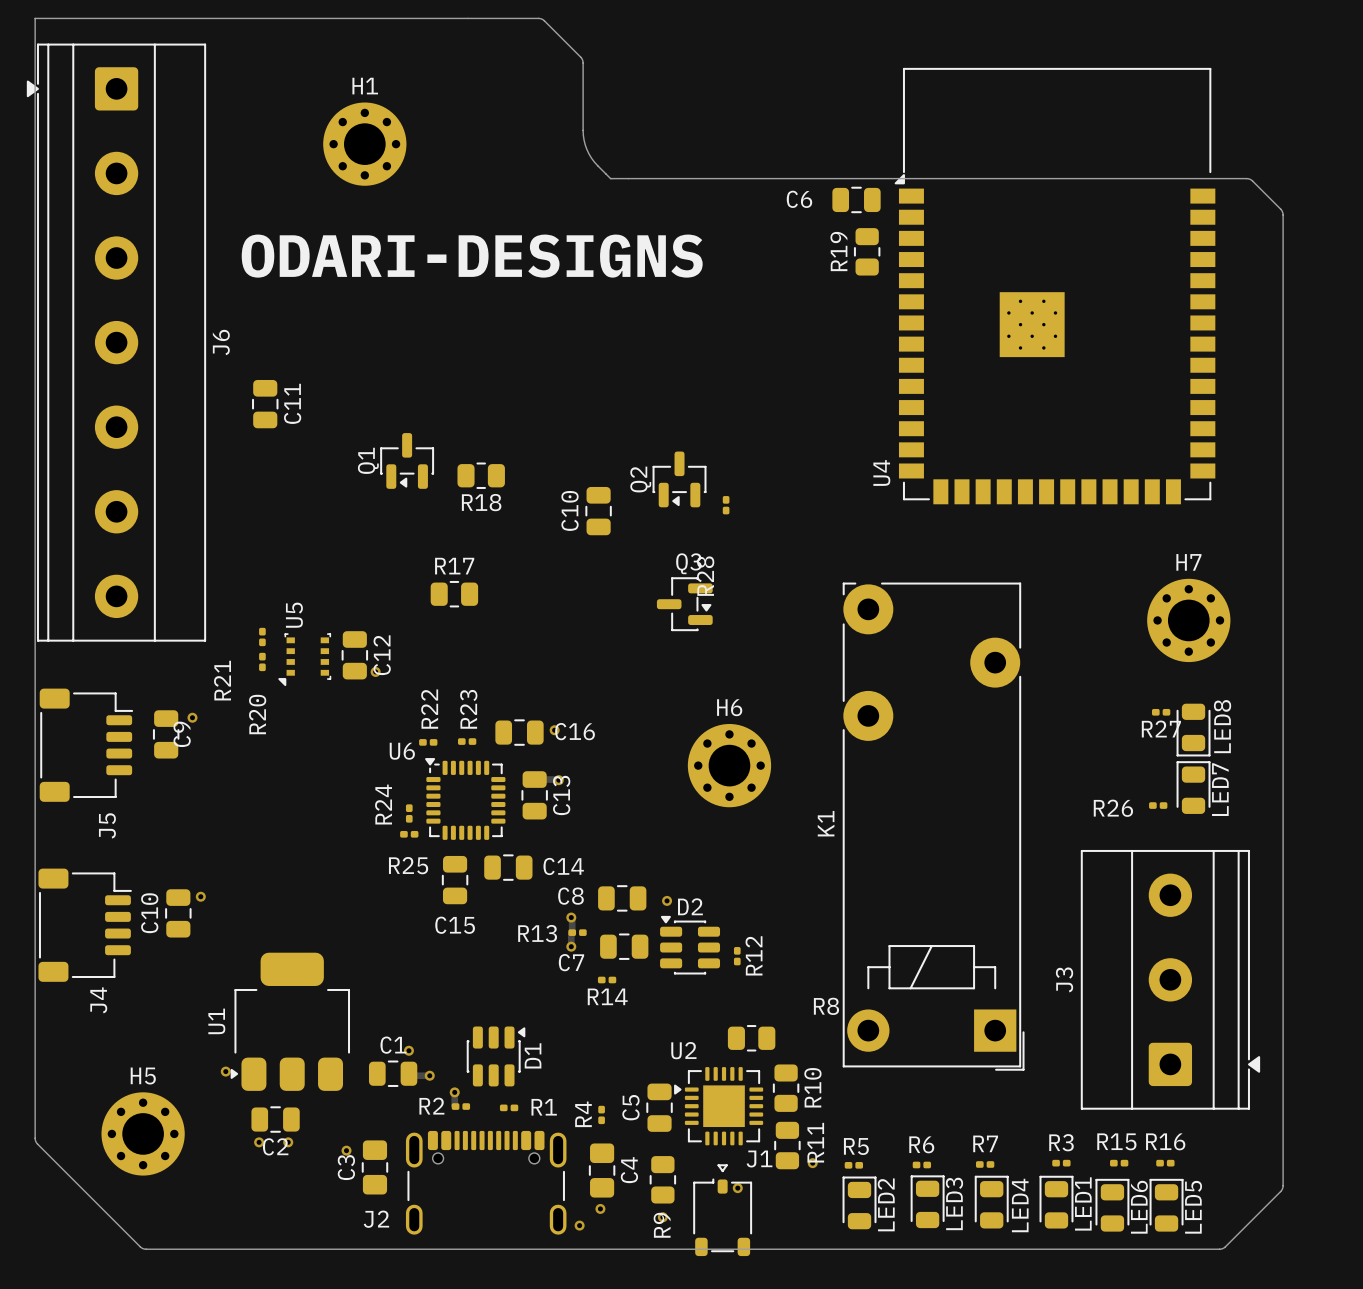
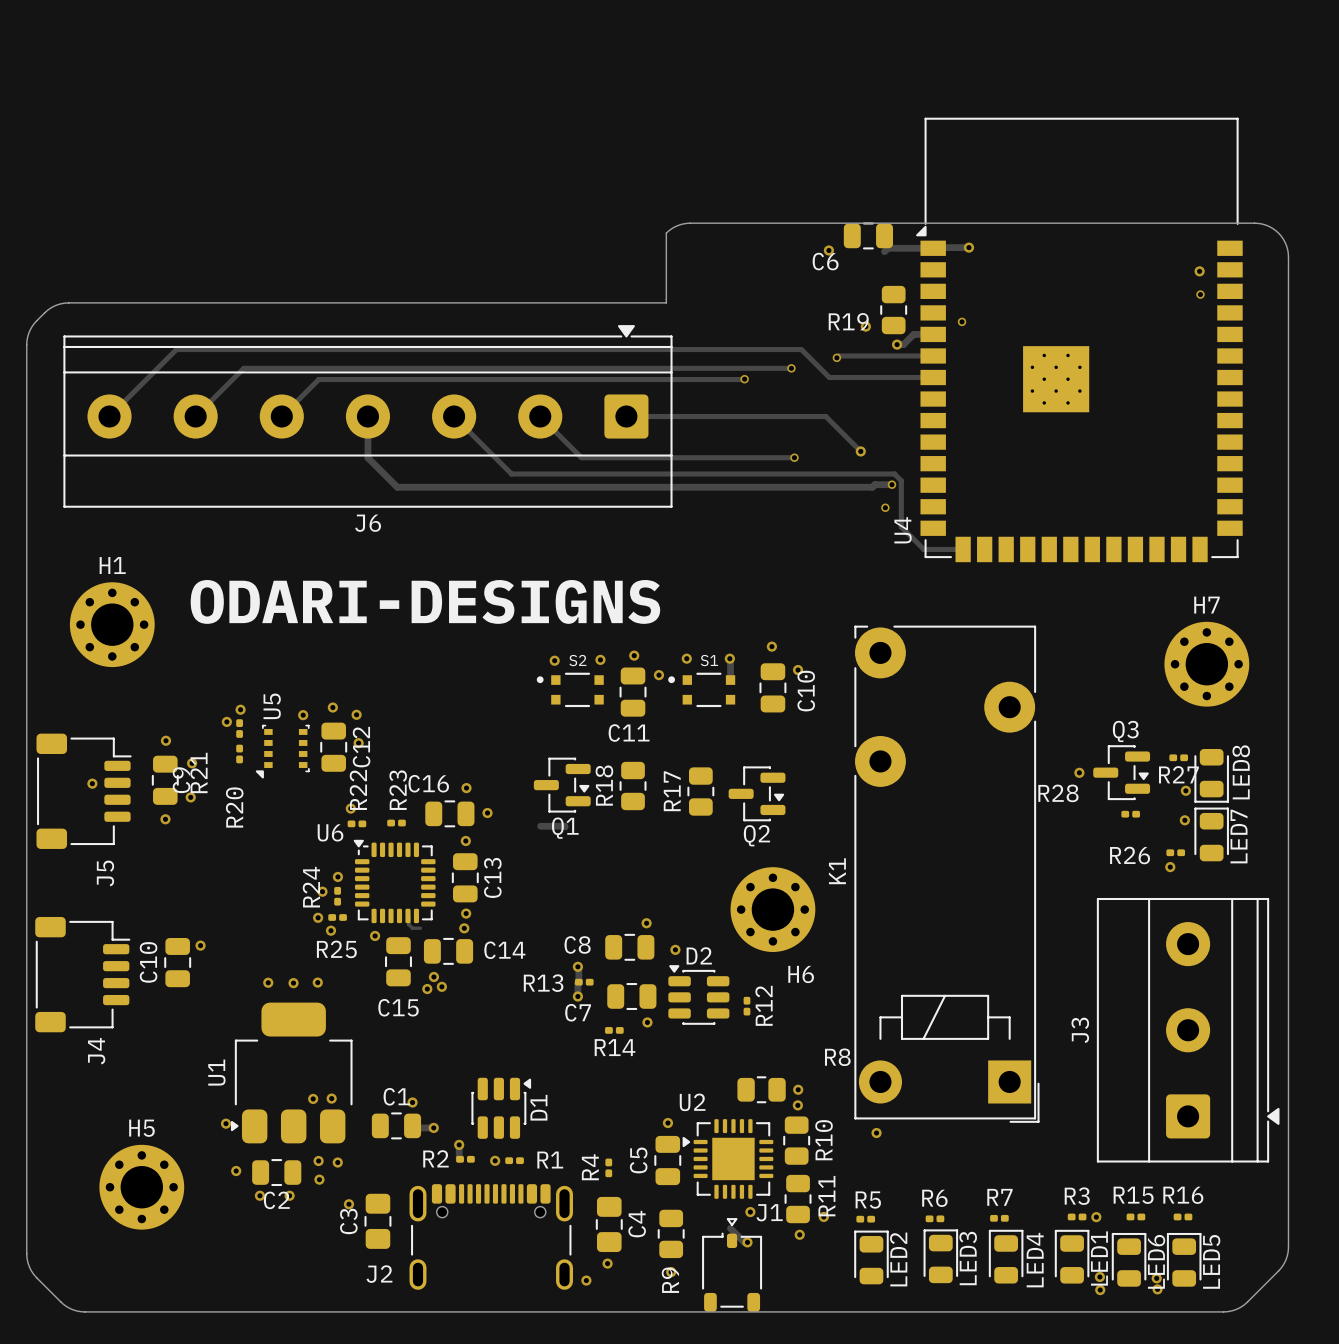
board edge: (35, 18) (540, 18) (582, 59) (584, 140) (591, 158) (610, 178) (1246, 178) (1252, 181) (1280, 209) (1283, 215) (1283, 1185) (1280, 1191) (1225, 1246) (1219, 1249) (146, 1249) (140, 1246) (37, 1144) (35, 1139) (35, 18) -> (690, 223) (677, 225) (666, 233) (666, 302) (68, 302) (59, 304) (48, 309) (30, 328) (26, 344) (26, 1253) (29, 1266) (33, 1274) (68, 1307) (84, 1311) (1223, 1311) (1232, 1310) (1244, 1304) (1284, 1263) (1288, 1247) (1288, 257) (1283, 239) (1272, 228) (1254, 223) (690, 223)
H1 position: (364, 144) -> (112, 624)
C6 name position: C6 (799, 199) -> C6 (825, 261)
track: none -> (968, 247) (887, 248) (884, 251)
via: none -> (968, 247)
via: none -> (828, 250)
via: none -> (1199, 271)
R19 name rotation: 0° (838, 251) -> 90° clockwise (848, 321)
R19 position: (867, 251) -> (893, 310)
text position: ODARI-DESIGNS (472, 256) -> ODARI-DESIGNS (425, 601)
via: none -> (1200, 294)
via: none -> (962, 321)
U4 position: (1054, 286) -> (1079, 339)
via: none -> (865, 326)
track: none -> (933, 334) (913, 334) (903, 344) (897, 344)
via: none -> (897, 344)
track: none -> (933, 355) (838, 355) (836, 357)
via: none -> (836, 357)
via: none -> (791, 368)
track: none -> (792, 367) (243, 368) (195, 416)
track: none -> (933, 377) (829, 377) (801, 349) (176, 349) (109, 416)
track: none -> (744, 379) (318, 379) (281, 416)
via: none -> (744, 379)
J6 rotation: 0° (116, 342) -> 90° clockwise (367, 416)
track: none -> (367, 416) (367, 457) (397, 487) (872, 487) (875, 484) (891, 484)
track: none -> (454, 416) (511, 474) (894, 474) (901, 480) (901, 526) (923, 549) (963, 549)
track: none -> (540, 416) (581, 457) (794, 457)
track: none -> (626, 416) (825, 416) (862, 453)
C11 name rotation: 0° (292, 403) -> 90° clockwise (629, 733)
C11 position: (265, 404) -> (633, 692)
via: none -> (860, 451)
via: none -> (794, 457)
via: none -> (891, 484)
Q1 rotation: 0° (407, 460) -> 90° counterclockwise (562, 785)
Q1 position: (407, 460) -> (562, 785)
via: none -> (885, 507)
R18 rotation: 0° (481, 475) -> 90° clockwise (633, 786)
R18 position: (481, 475) -> (633, 786)
Q2 rotation: 0° (679, 479) -> 90° counterclockwise (757, 793)
Q2 position: (679, 479) -> (757, 793)
R28 rotation: 0° (726, 505) -> 90° clockwise (1130, 814)
R28 position: (726, 505) -> (1130, 814)
C10 name position: C10 (570, 510) -> C10 (806, 691)
C10 position: (598, 511) -> (772, 687)
R17 name position: R17 (454, 566) -> R17 (672, 791)
R17 rotation: 0° (454, 594) -> 90° clockwise (700, 791)
R17 position: (454, 594) -> (700, 791)
via: none -> (771, 646)
Q3 position: (684, 604) -> (1121, 772)
via: none -> (634, 655)
via: none -> (686, 658)
track: none -> (729, 658) (730, 680)
via: none -> (729, 658)
via: none -> (600, 659)
via: none -> (554, 660)
via: none -> (798, 670)
via: none -> (658, 675)
R21 position: (262, 636) -> (239, 728)
S2: none -> (570, 689)
S1: none -> (701, 689)
C12 position: (354, 655) -> (333, 747)
U5 position: (304, 659) -> (282, 751)
R20 position: (262, 661) -> (239, 753)
via: none -> (332, 707)
via: none -> (240, 709)
via: none -> (303, 715)
via: none -> (356, 714)
via: (375, 671) -> none
via: none -> (226, 721)
via: none -> (165, 740)
via: none -> (358, 743)
H6 name position: H6 (729, 707) -> H6 (801, 974)
via: none -> (1079, 772)
via: (554, 730) -> none
C16 name position: C16 (575, 731) -> C16 (428, 783)
C16 position: (519, 732) -> (449, 813)
via: none -> (92, 783)
R23 position: (467, 741) -> (396, 823)
R22 position: (428, 742) -> (356, 823)
via: none -> (466, 788)
via: none -> (1185, 790)
via: none -> (190, 797)
via: none -> (350, 808)
H6 position: (729, 765) -> (772, 909)
via: none -> (487, 813)
via: none -> (165, 819)
via: none -> (1184, 820)
via: (558, 780) -> none
via: none -> (465, 840)
C13 position: (534, 795) -> (465, 877)
U6 position: (465, 798) -> (394, 881)
R24 position: (409, 813) -> (337, 896)
via: none -> (1170, 867)
via: none -> (337, 876)
R25 position: (409, 834) -> (337, 917)
via: none -> (322, 891)
via: none -> (466, 913)
track: none -> (408, 915) (408, 924) (412, 928) (420, 928)
C14 position: (508, 867) -> (448, 951)
via: none -> (318, 917)
via: none -> (646, 923)
via: none -> (464, 928)
C15 position: (455, 880) -> (398, 961)
via: none -> (330, 930)
via: none -> (375, 935)
via: none -> (433, 977)
via: none -> (268, 982)
via: none -> (293, 983)
via: none -> (317, 982)
via: none -> (441, 986)
via: none -> (427, 989)
via: none -> (647, 1022)
via: none -> (798, 1089)
via: none -> (331, 1098)
via: none -> (313, 1098)
via: none -> (797, 1105)
via: none -> (667, 1123)
via: none -> (876, 1133)
via: none -> (318, 1161)
via: none -> (495, 1160)
via: none -> (337, 1162)
via: none -> (236, 1171)
via: none -> (319, 1179)
via: none -> (750, 1212)
via: none -> (1096, 1217)
track: none -> (730, 1228) (744, 1242) (747, 1242)
via: none -> (799, 1234)
via: none -> (1099, 1277)
via: none -> (1156, 1278)
via: none -> (1100, 1290)
via: none -> (1157, 1289)

